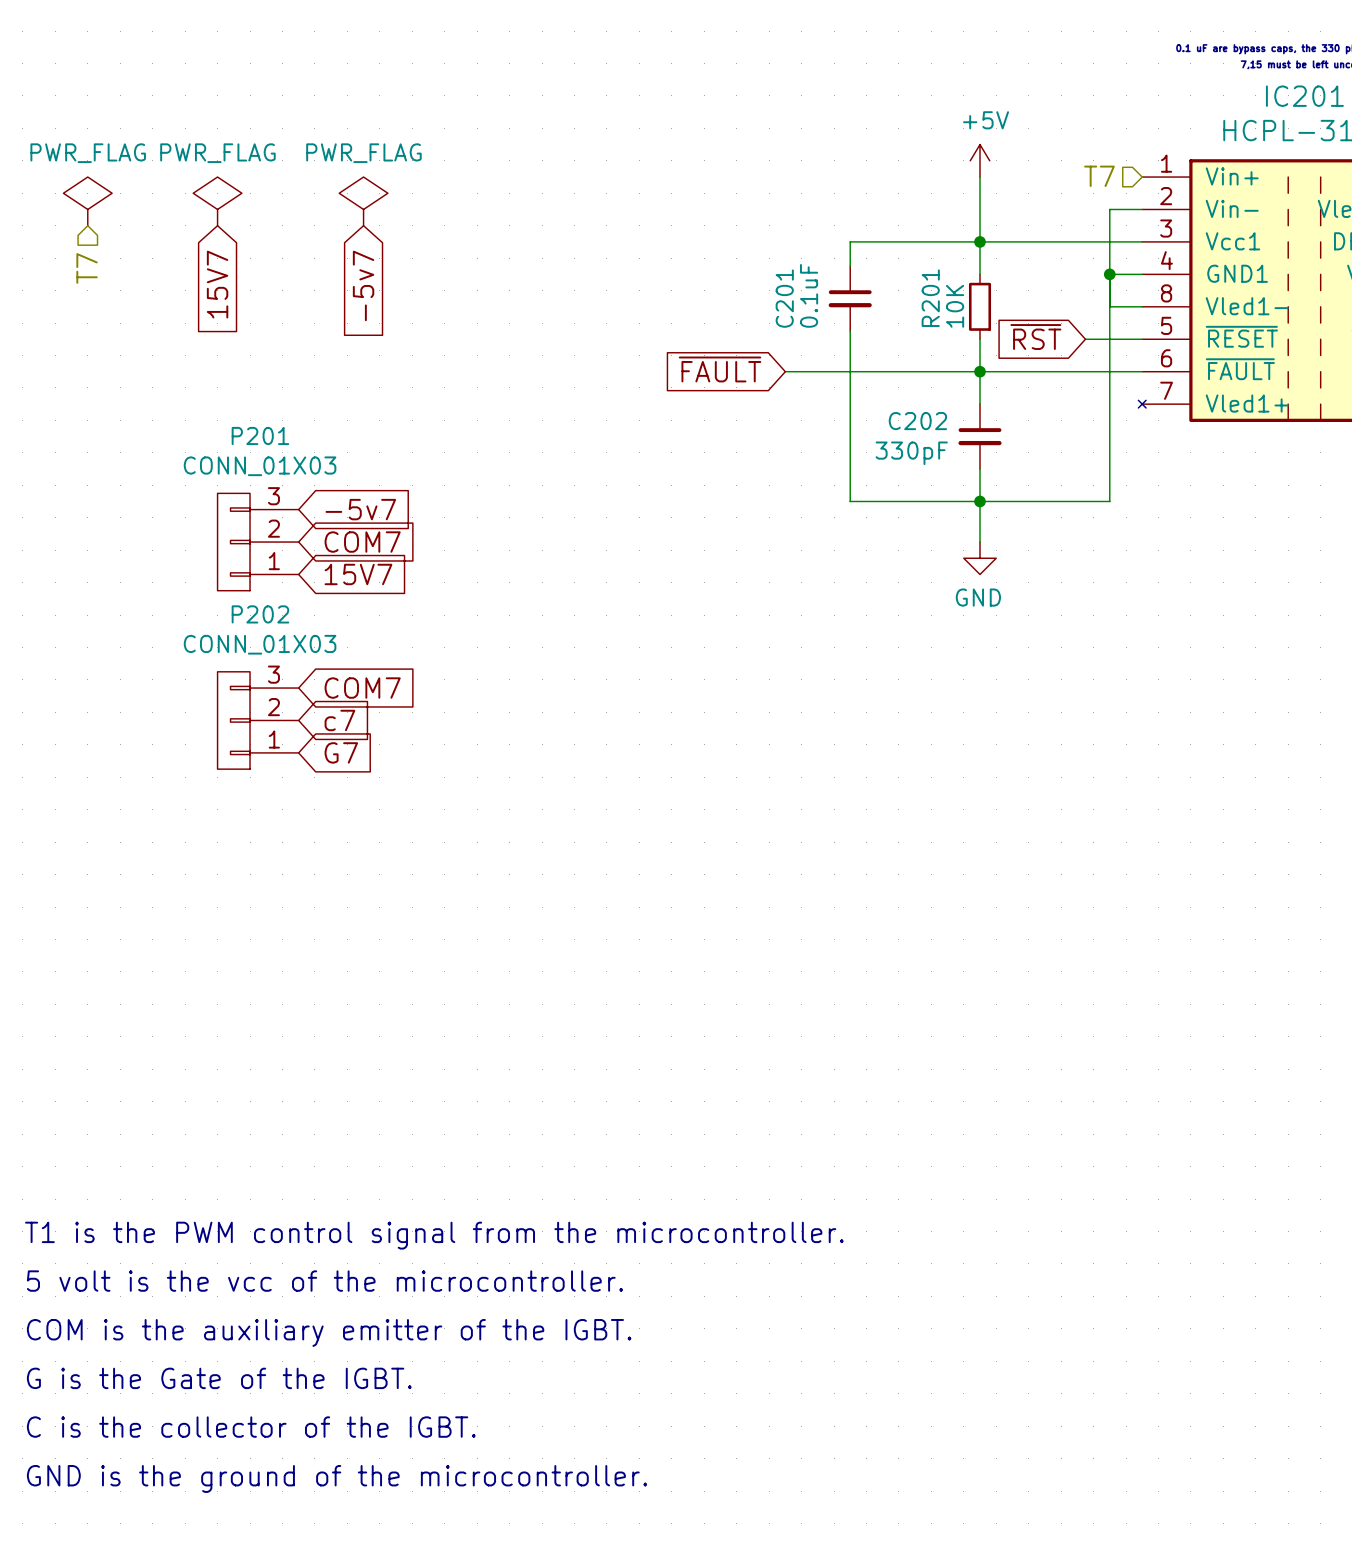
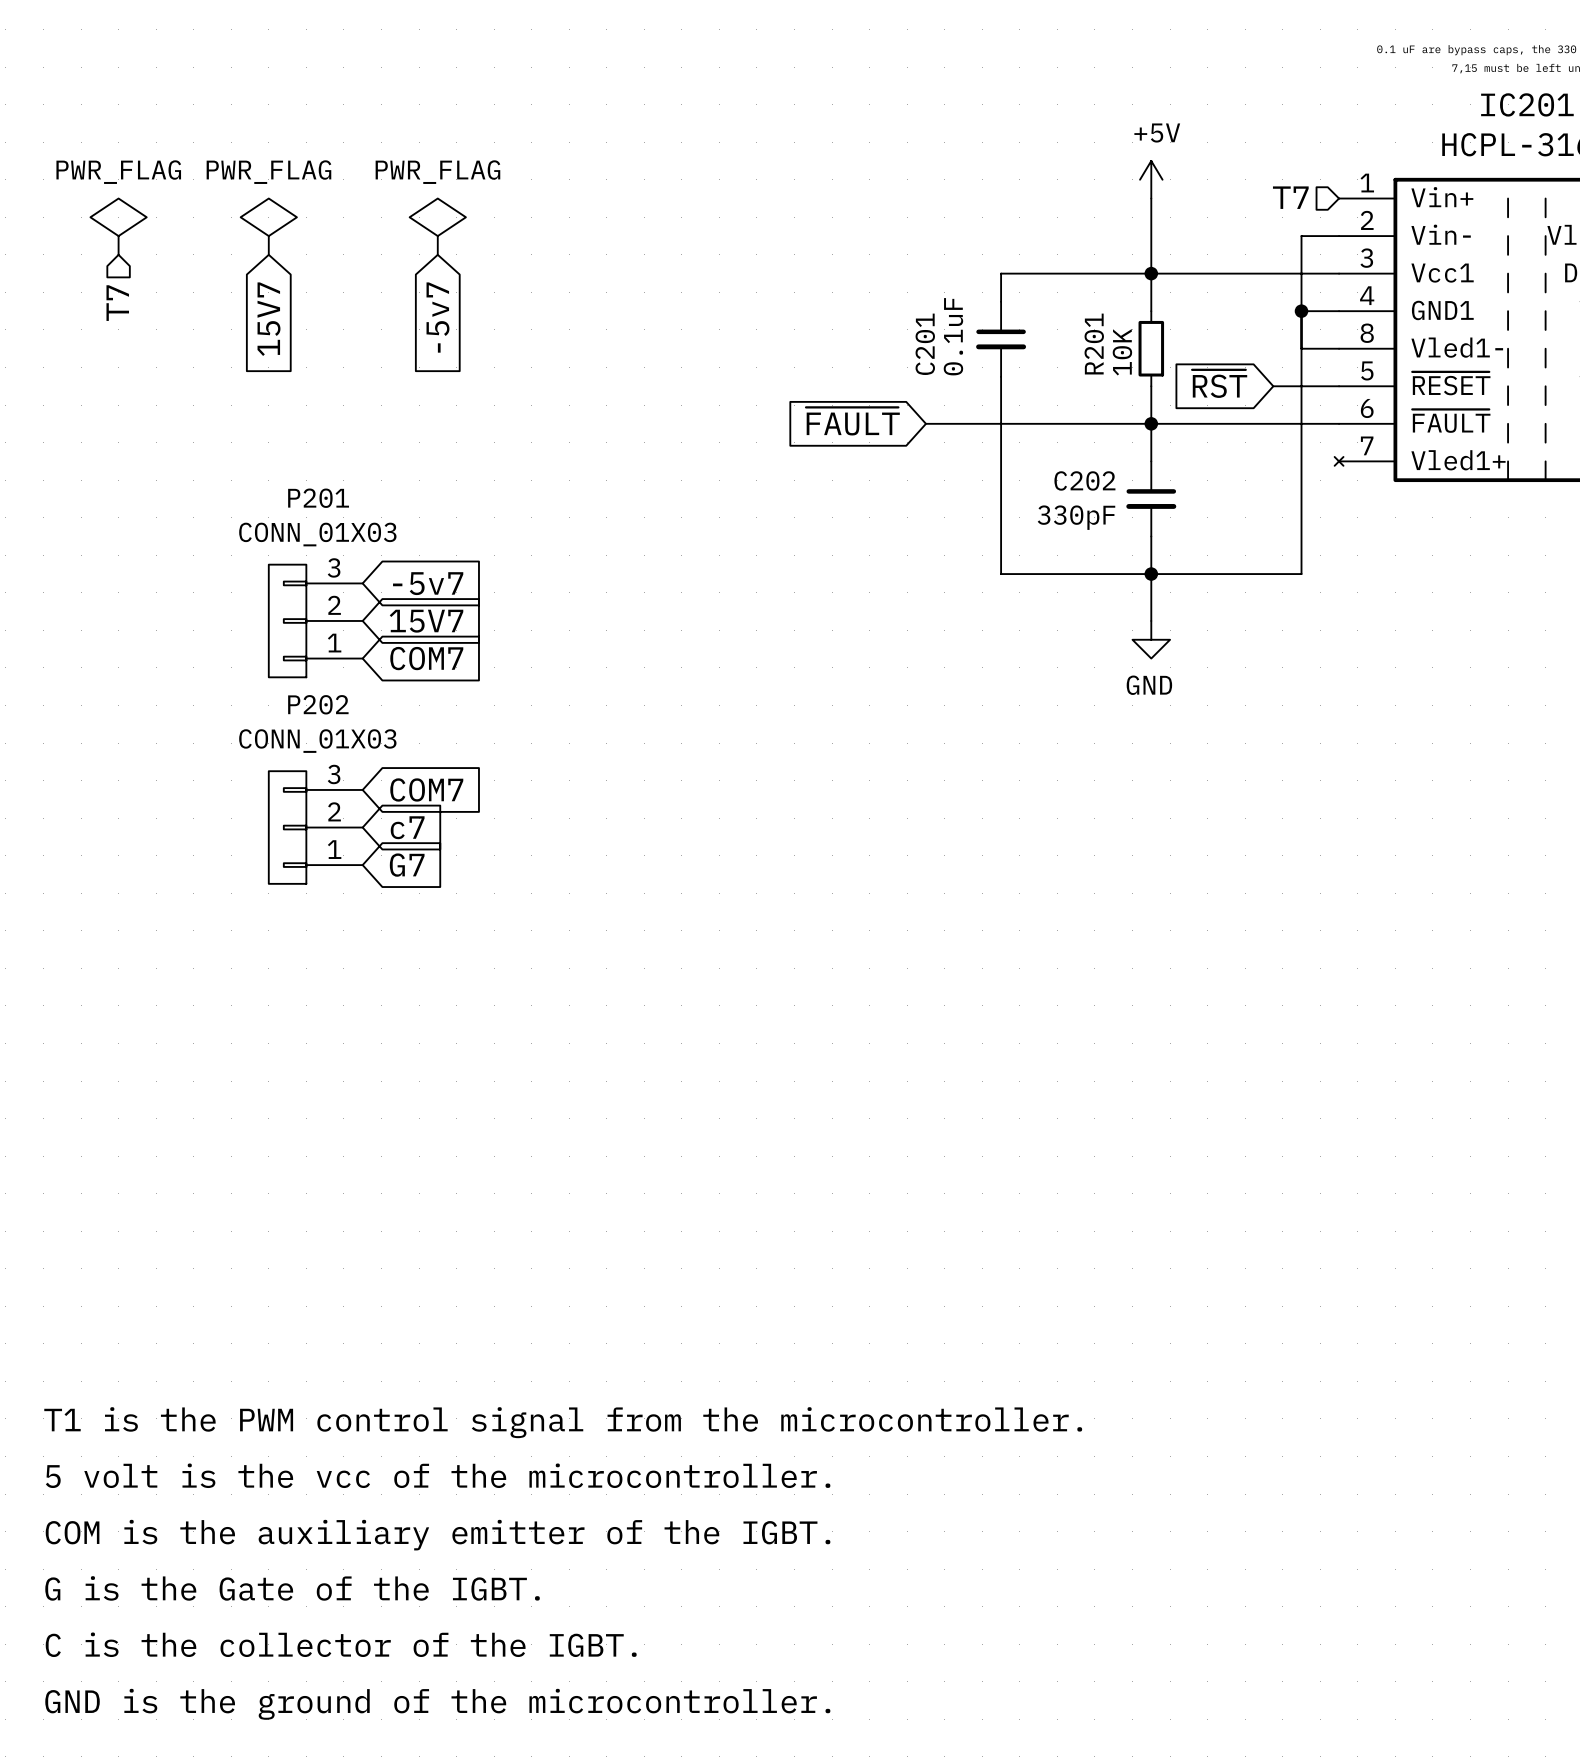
global label: COM7 (362, 542) -> 15V7 (426, 621)
global label: 15V7 (358, 574) -> COM7 (426, 658)

